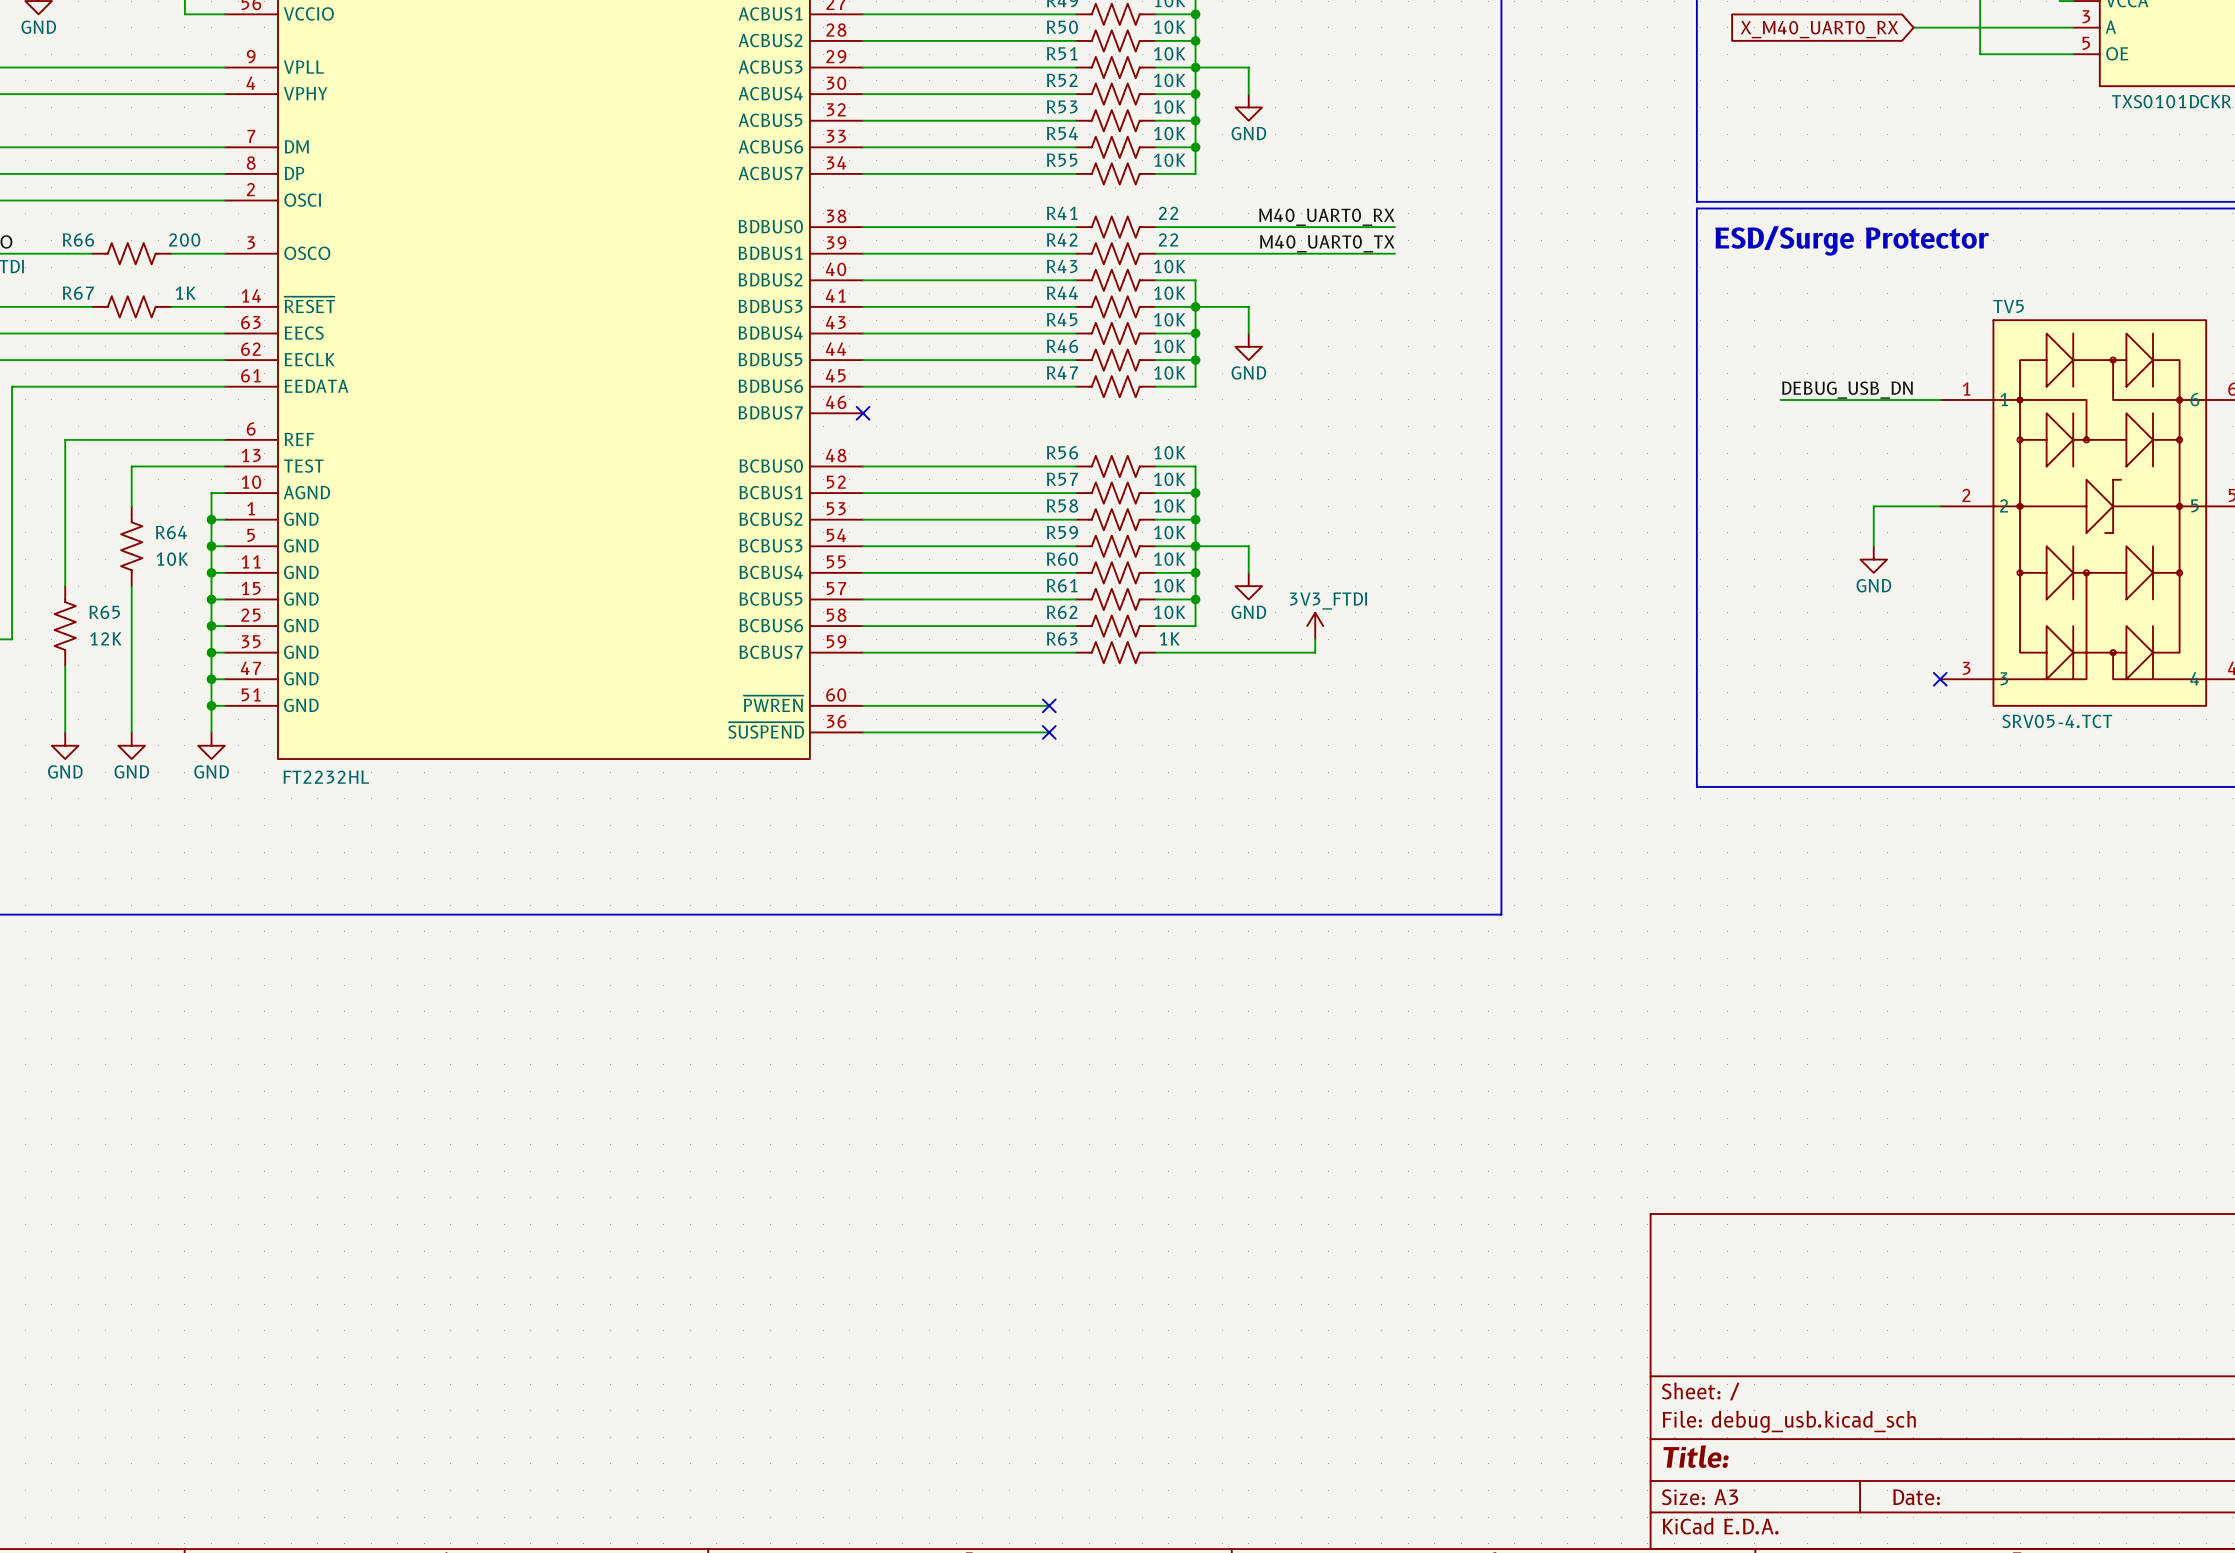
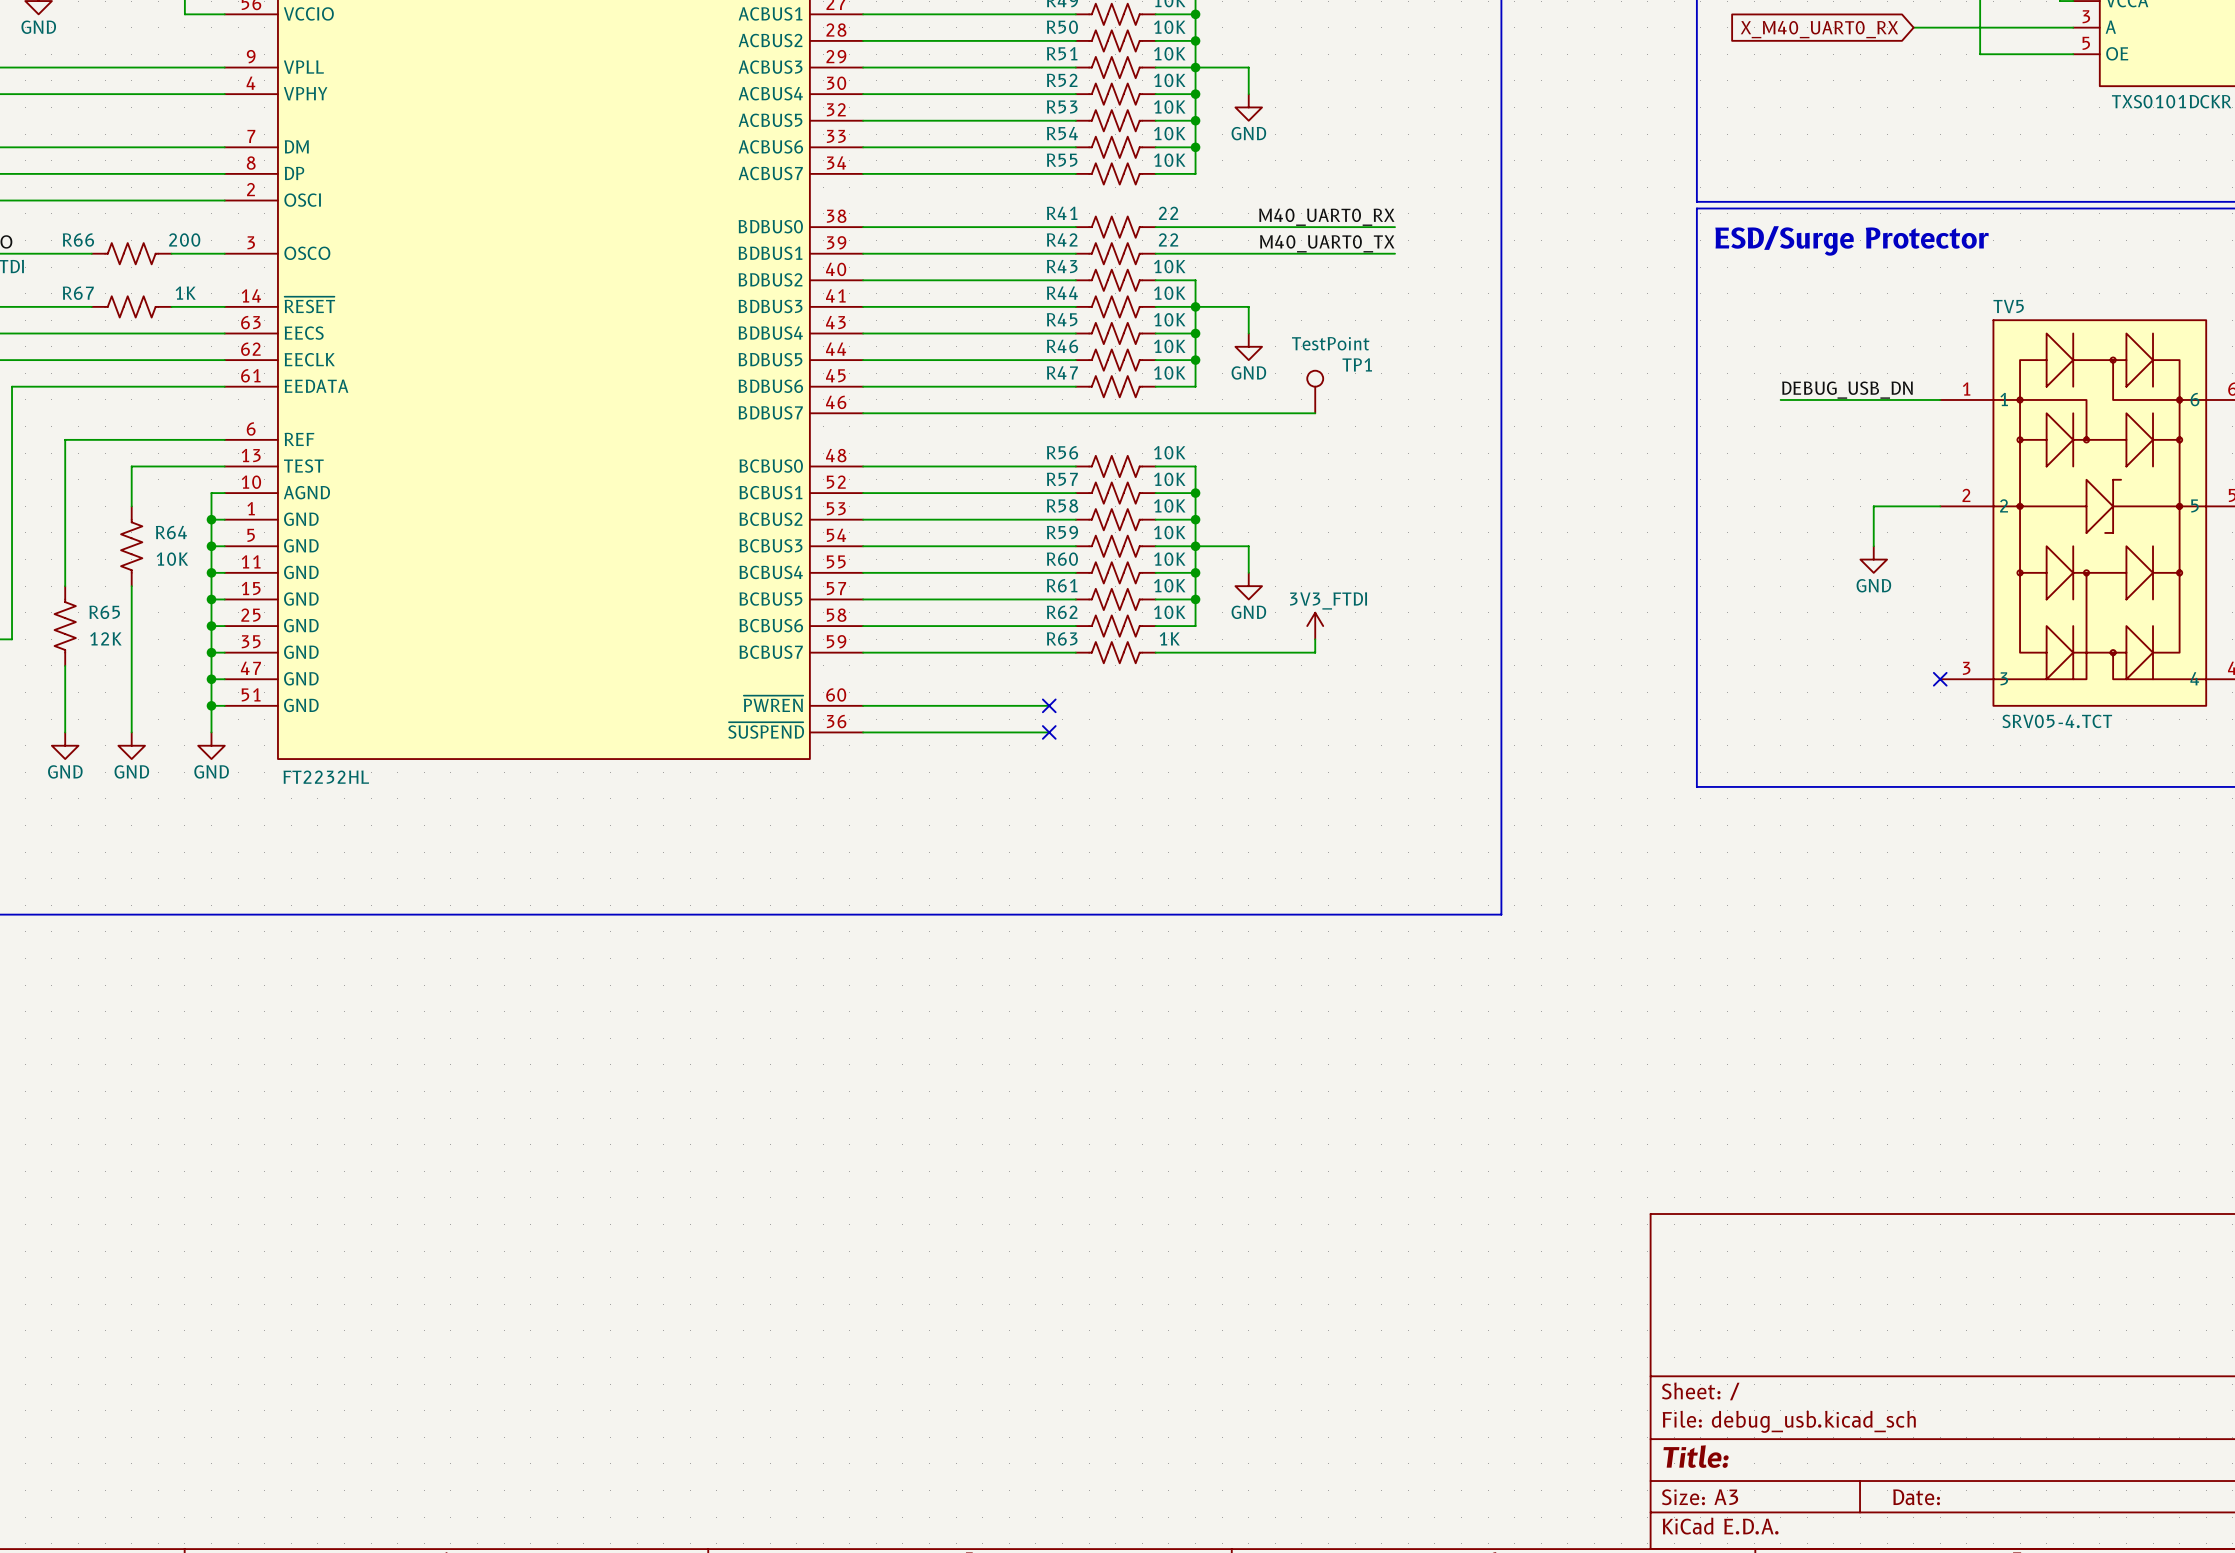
TP1: none -> TestPoint (1315, 392)
wire: none -> (863, 413) (1315, 413)
no-connect mark: (863, 413) -> none

